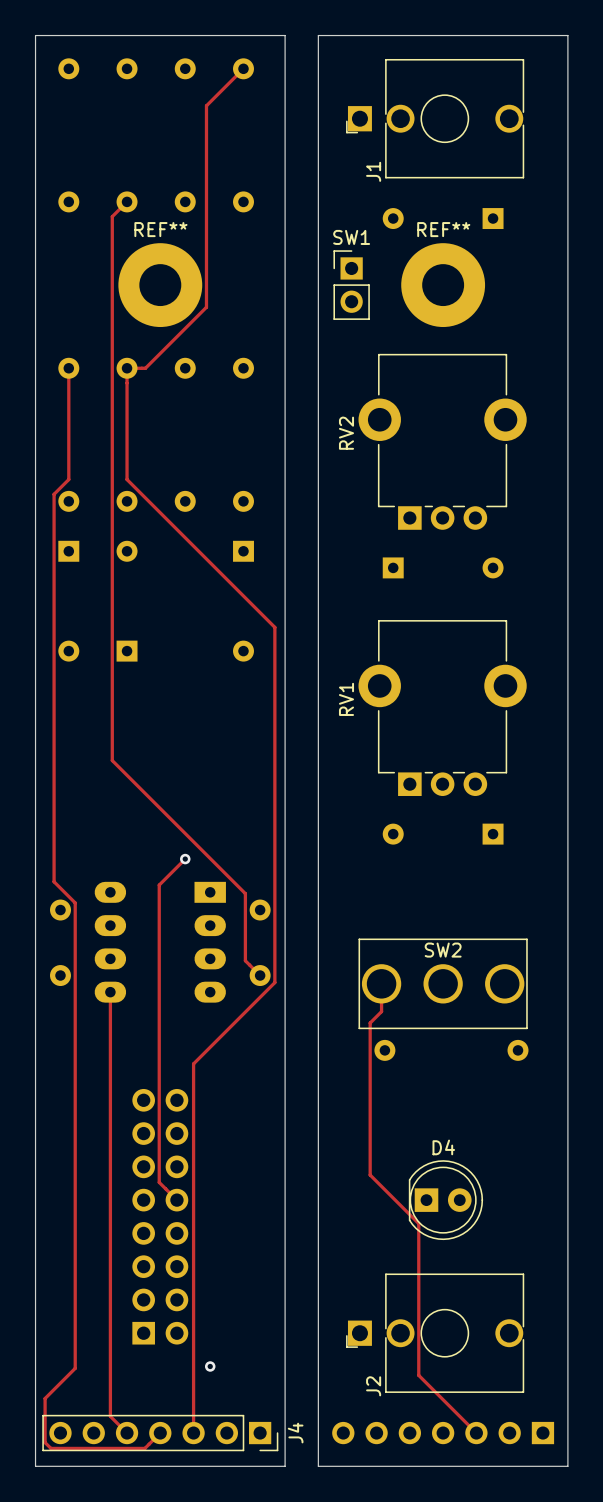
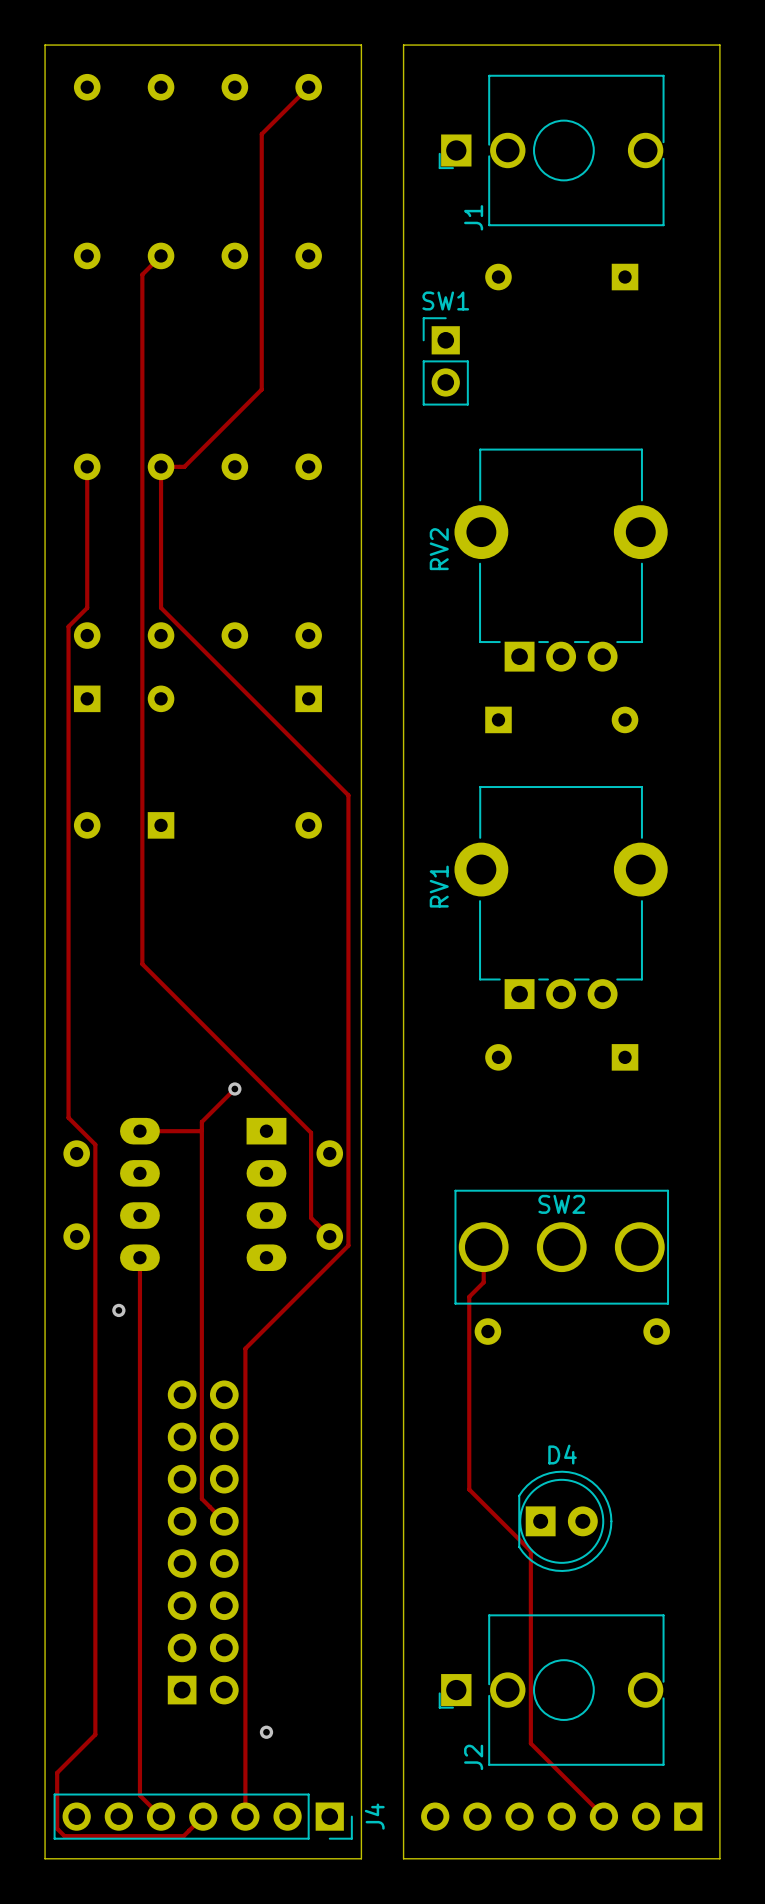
REF**: (160, 285) -> none
REF**: (443, 285) -> none
track: none -> (201, 1129) (139, 1131)
via: none -> (118, 1310)

